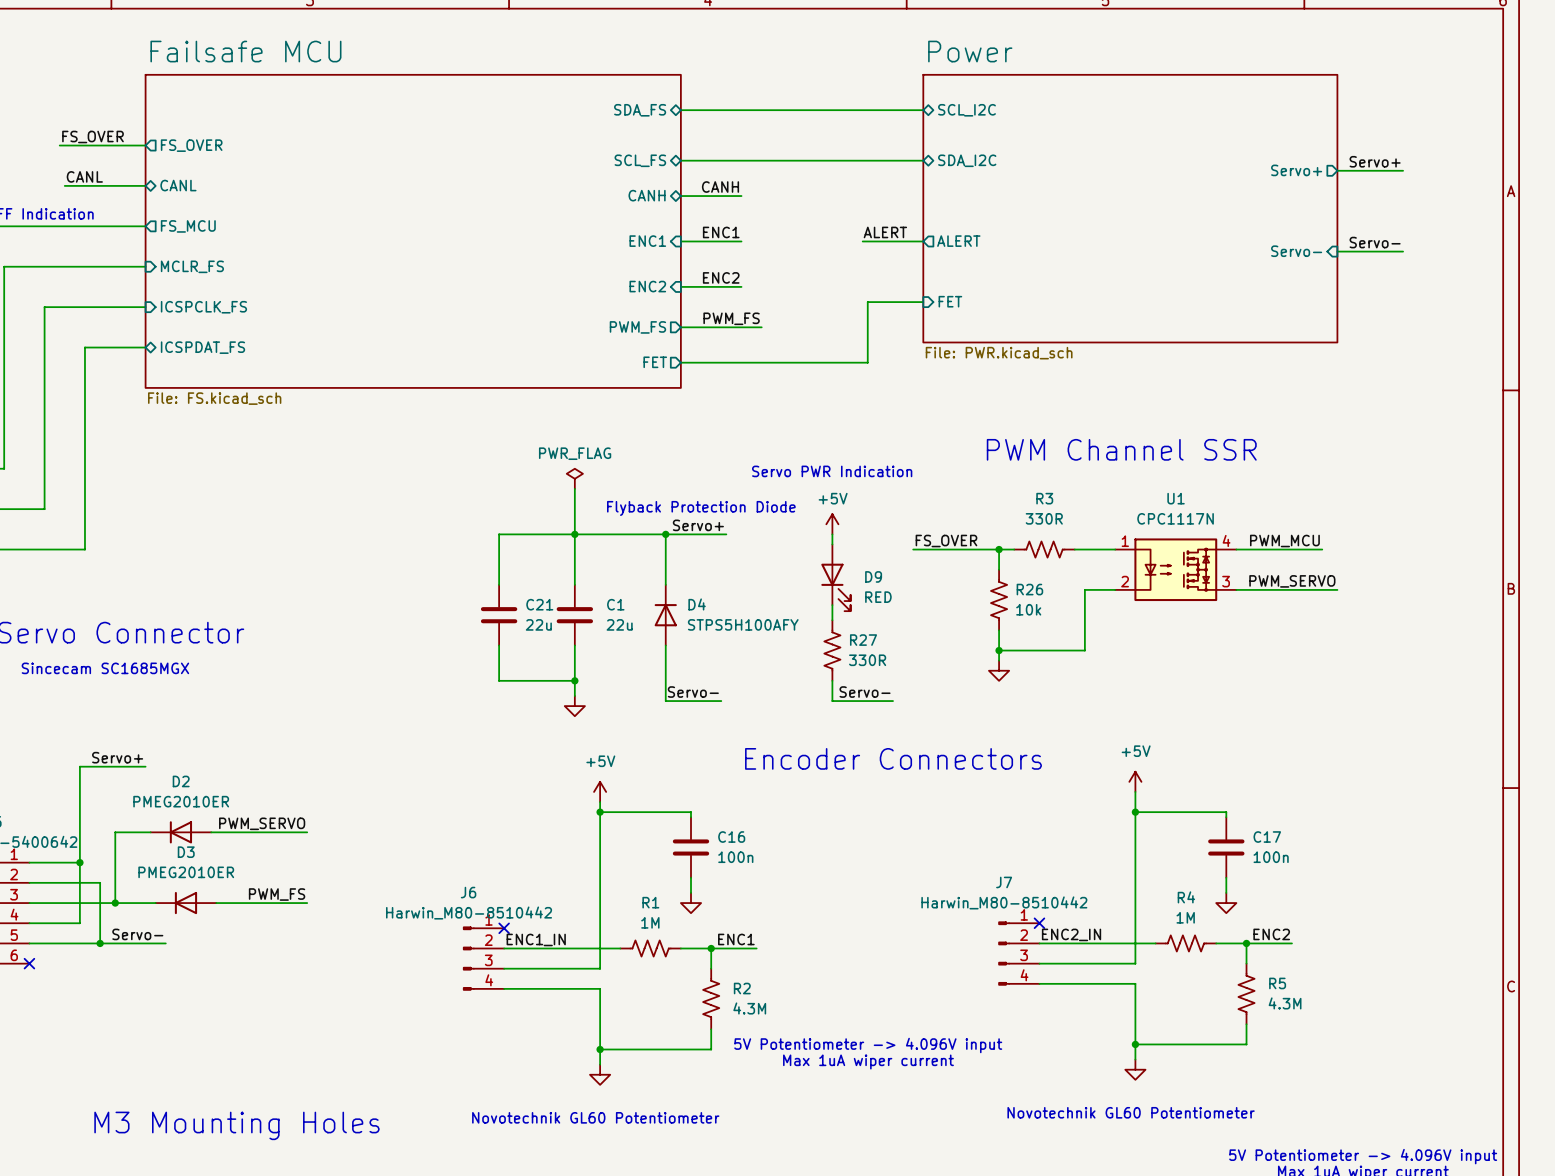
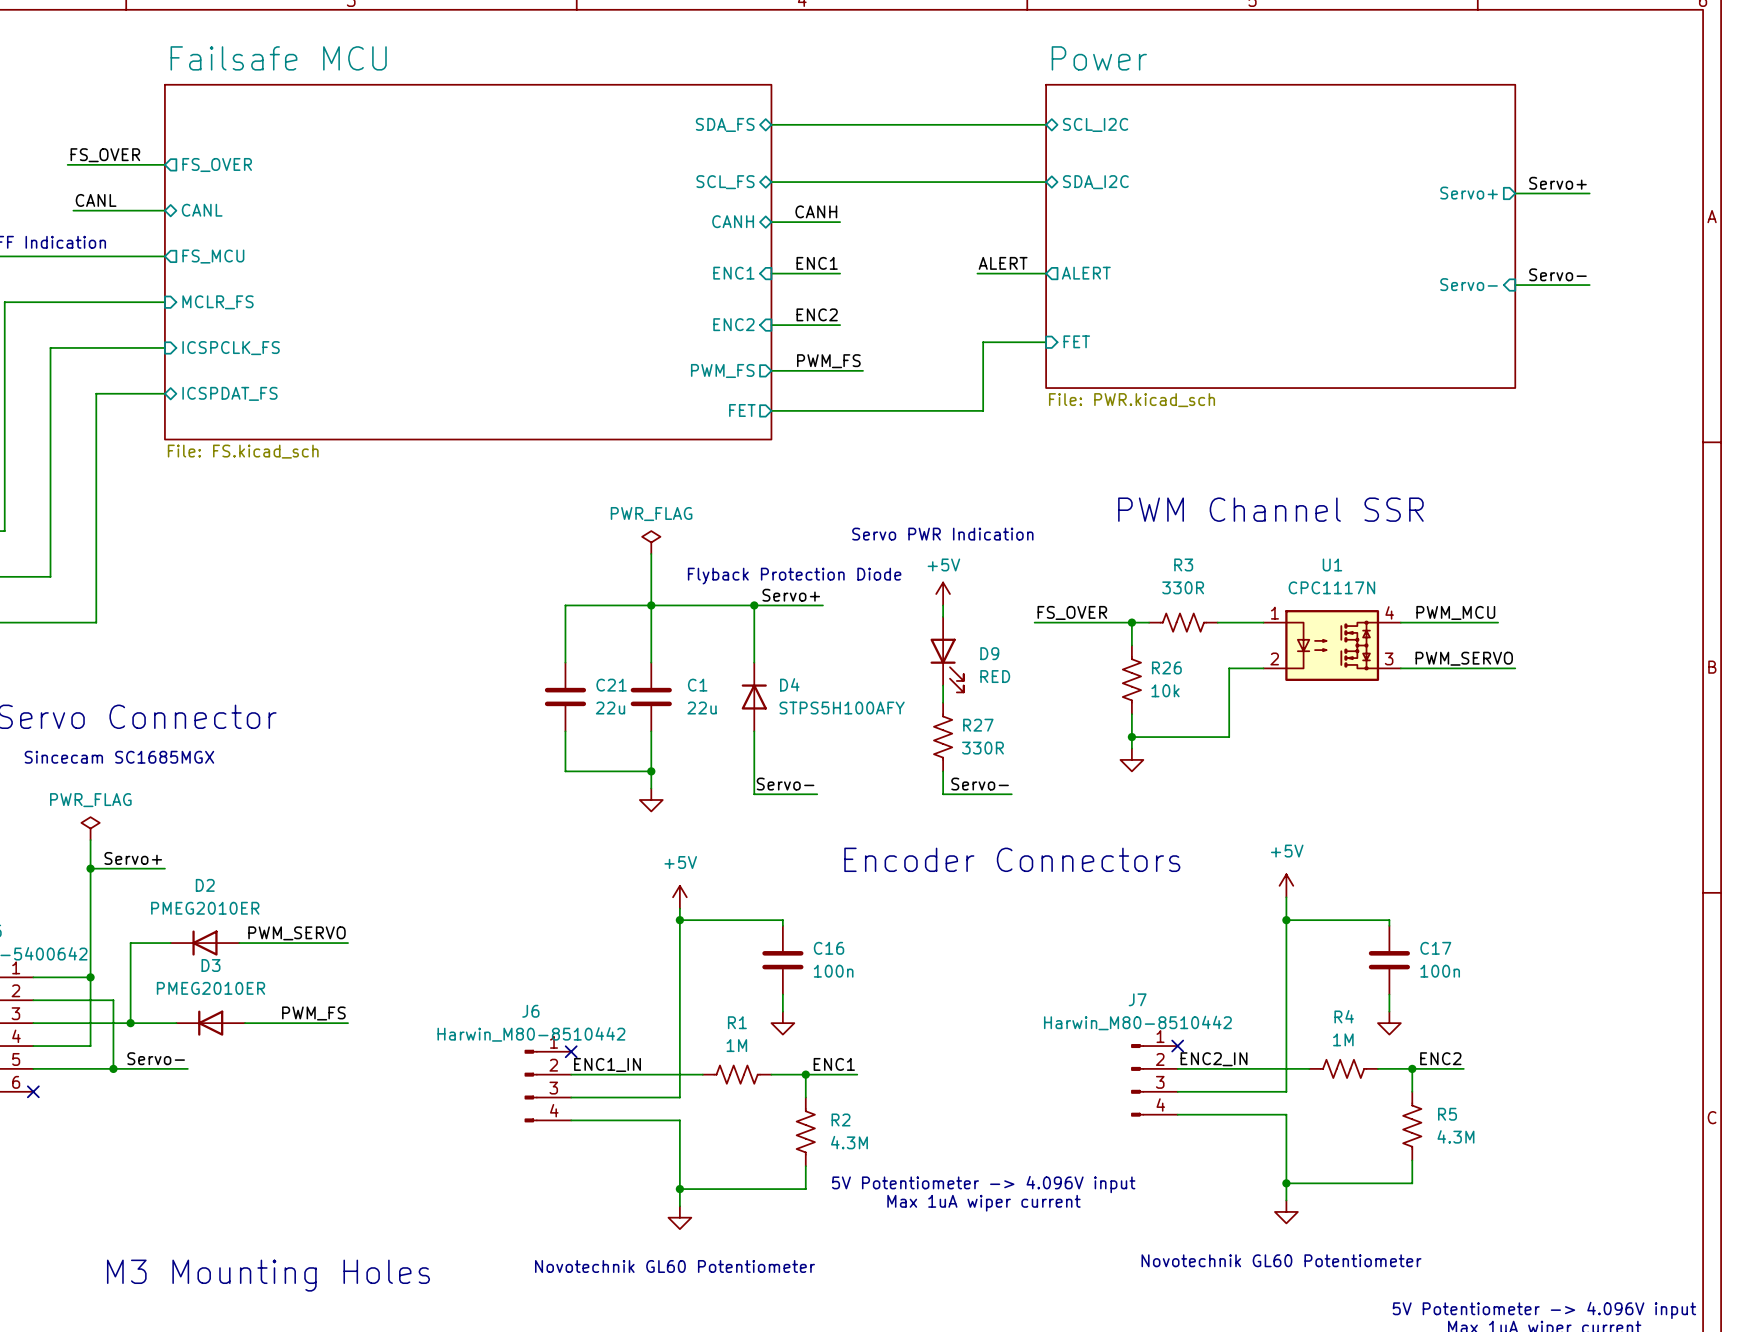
power symbol: none -> PWR_FLAG (90, 828)
wire: none -> (90, 840) (90, 868)
junction: none -> (90, 868)

